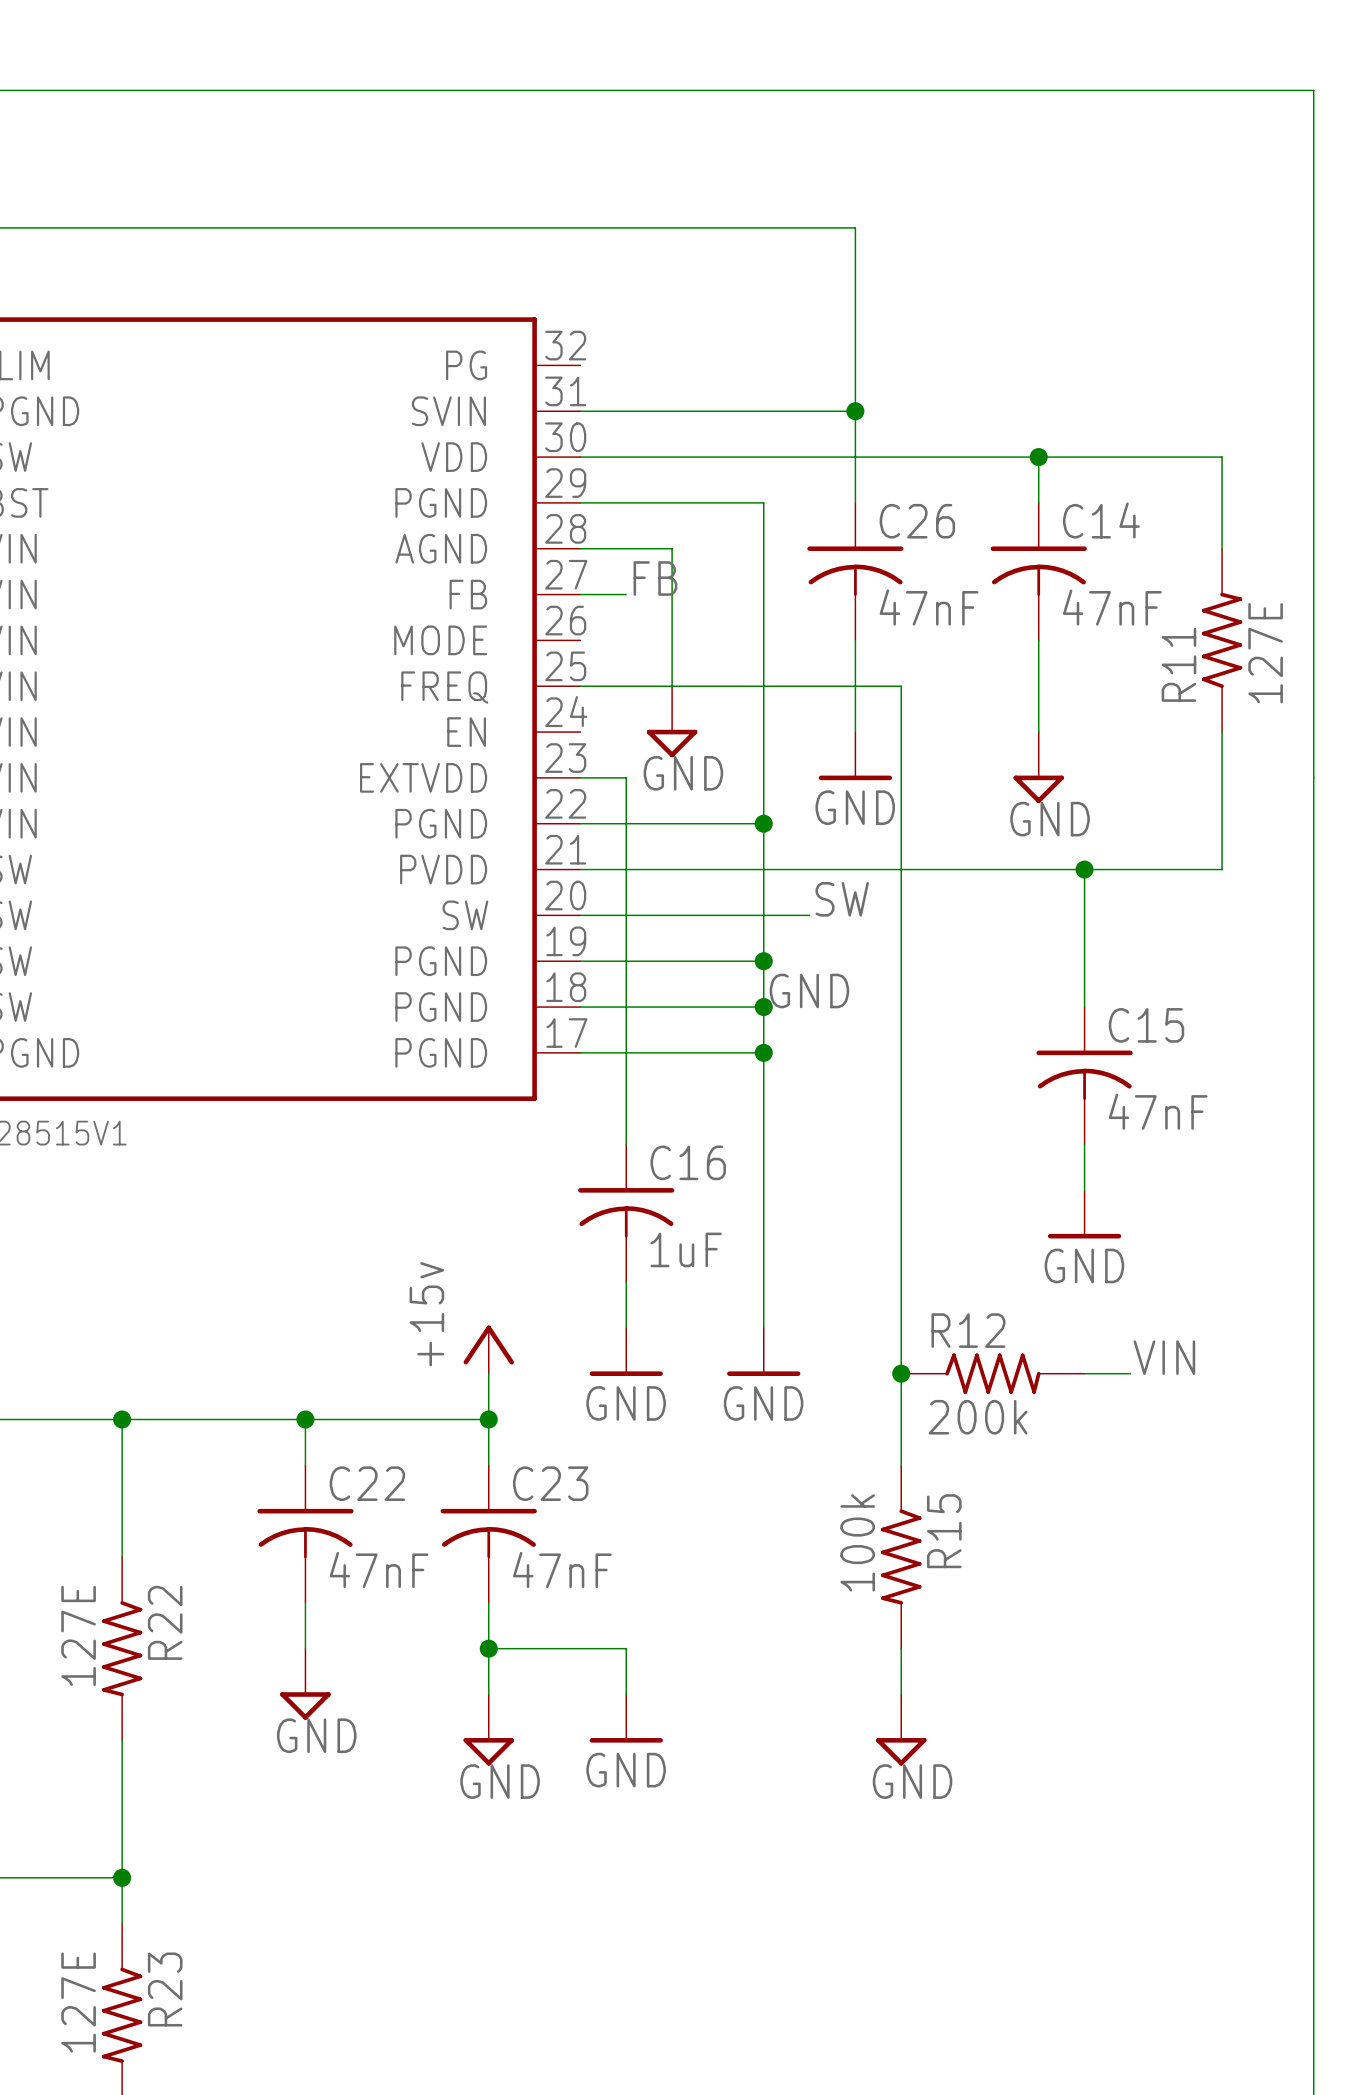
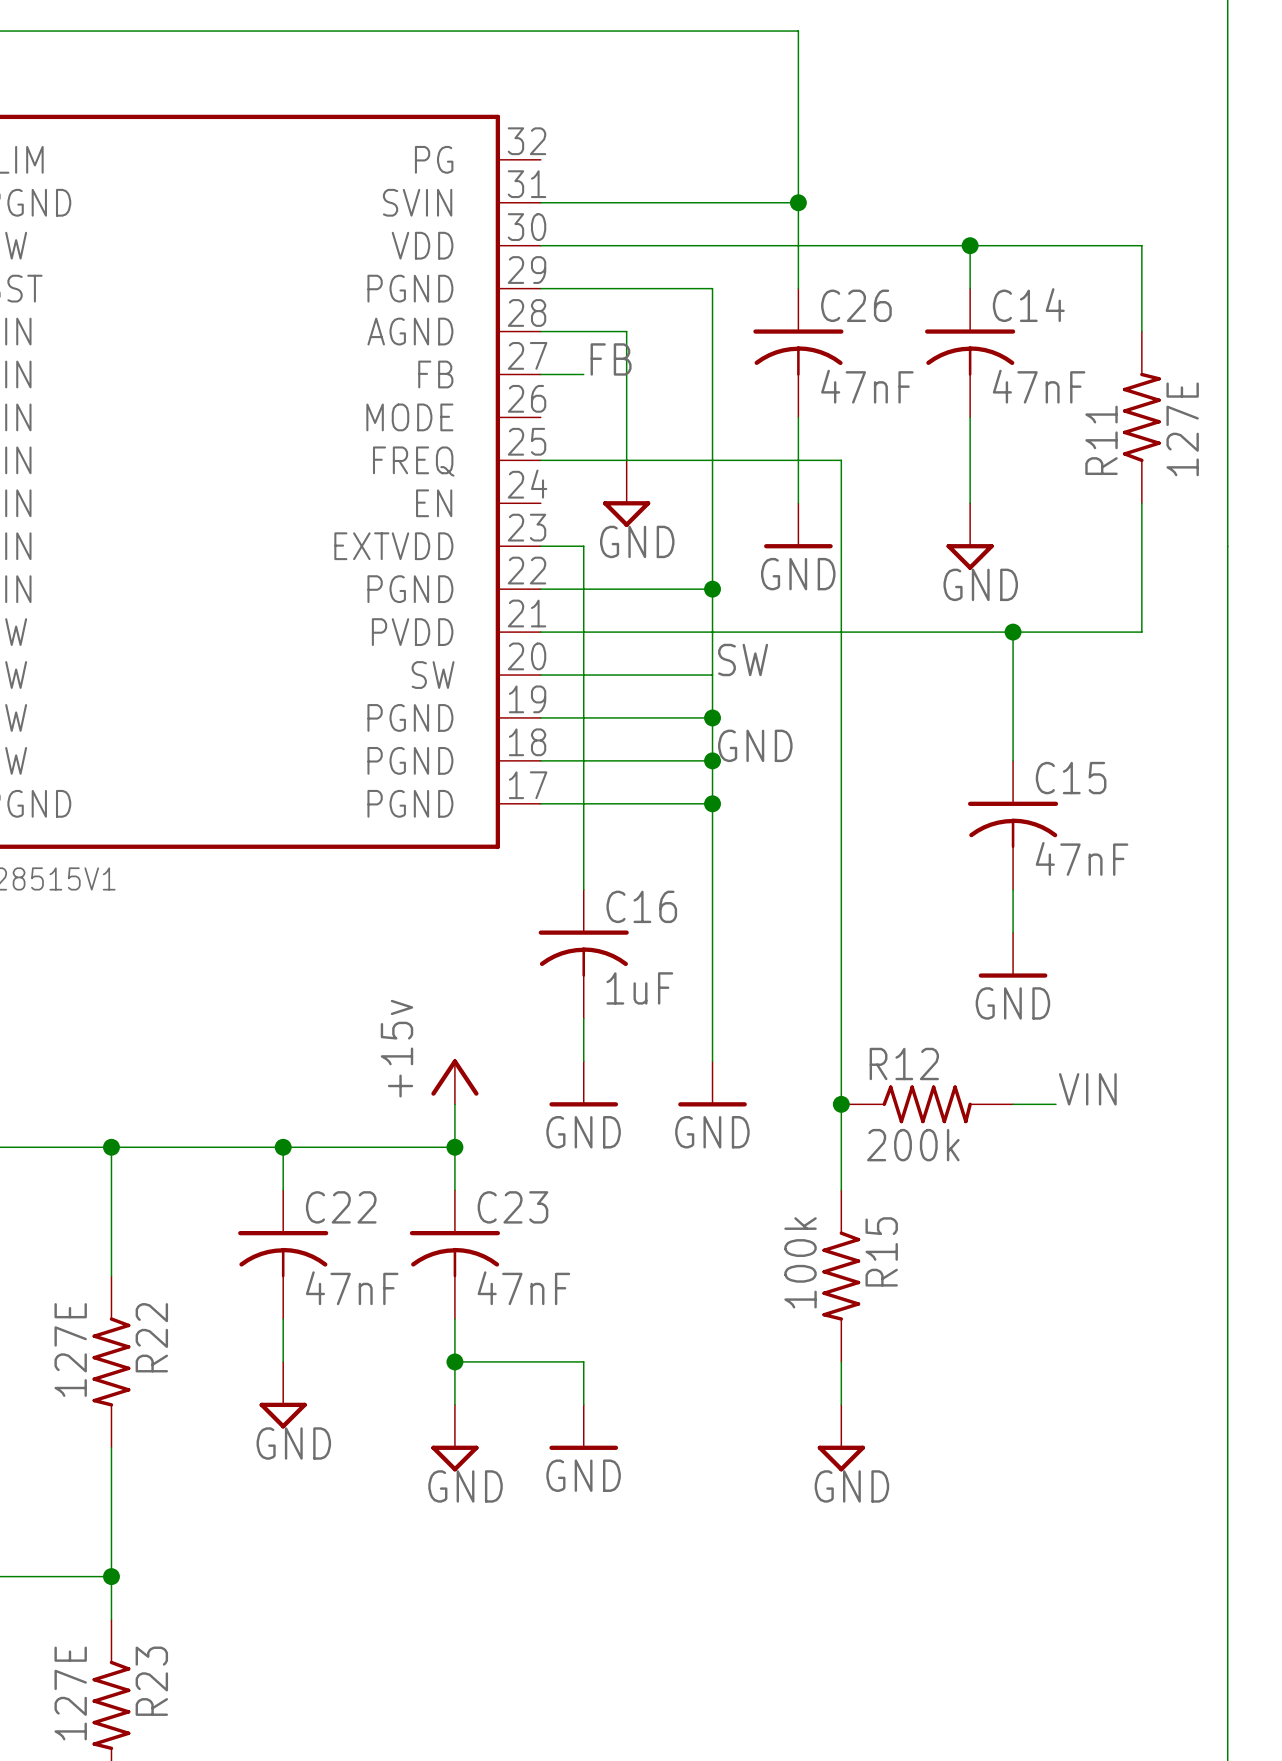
label position: SW (842, 899) -> SW (743, 659)
wire: (763, 915) (809, 915) -> none

